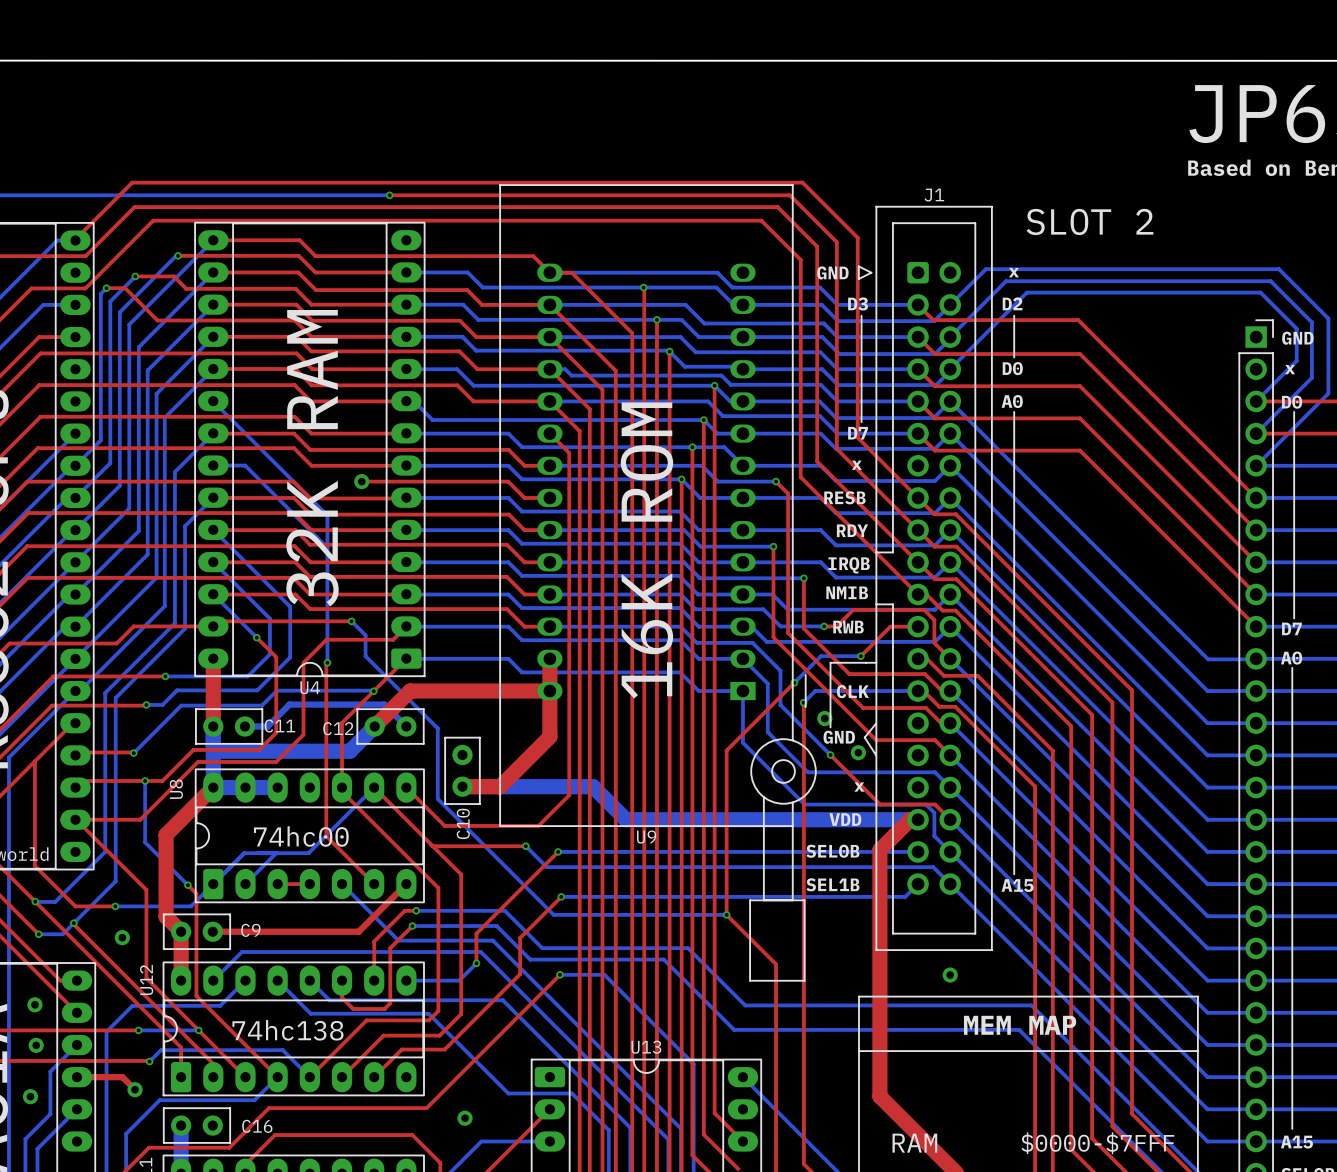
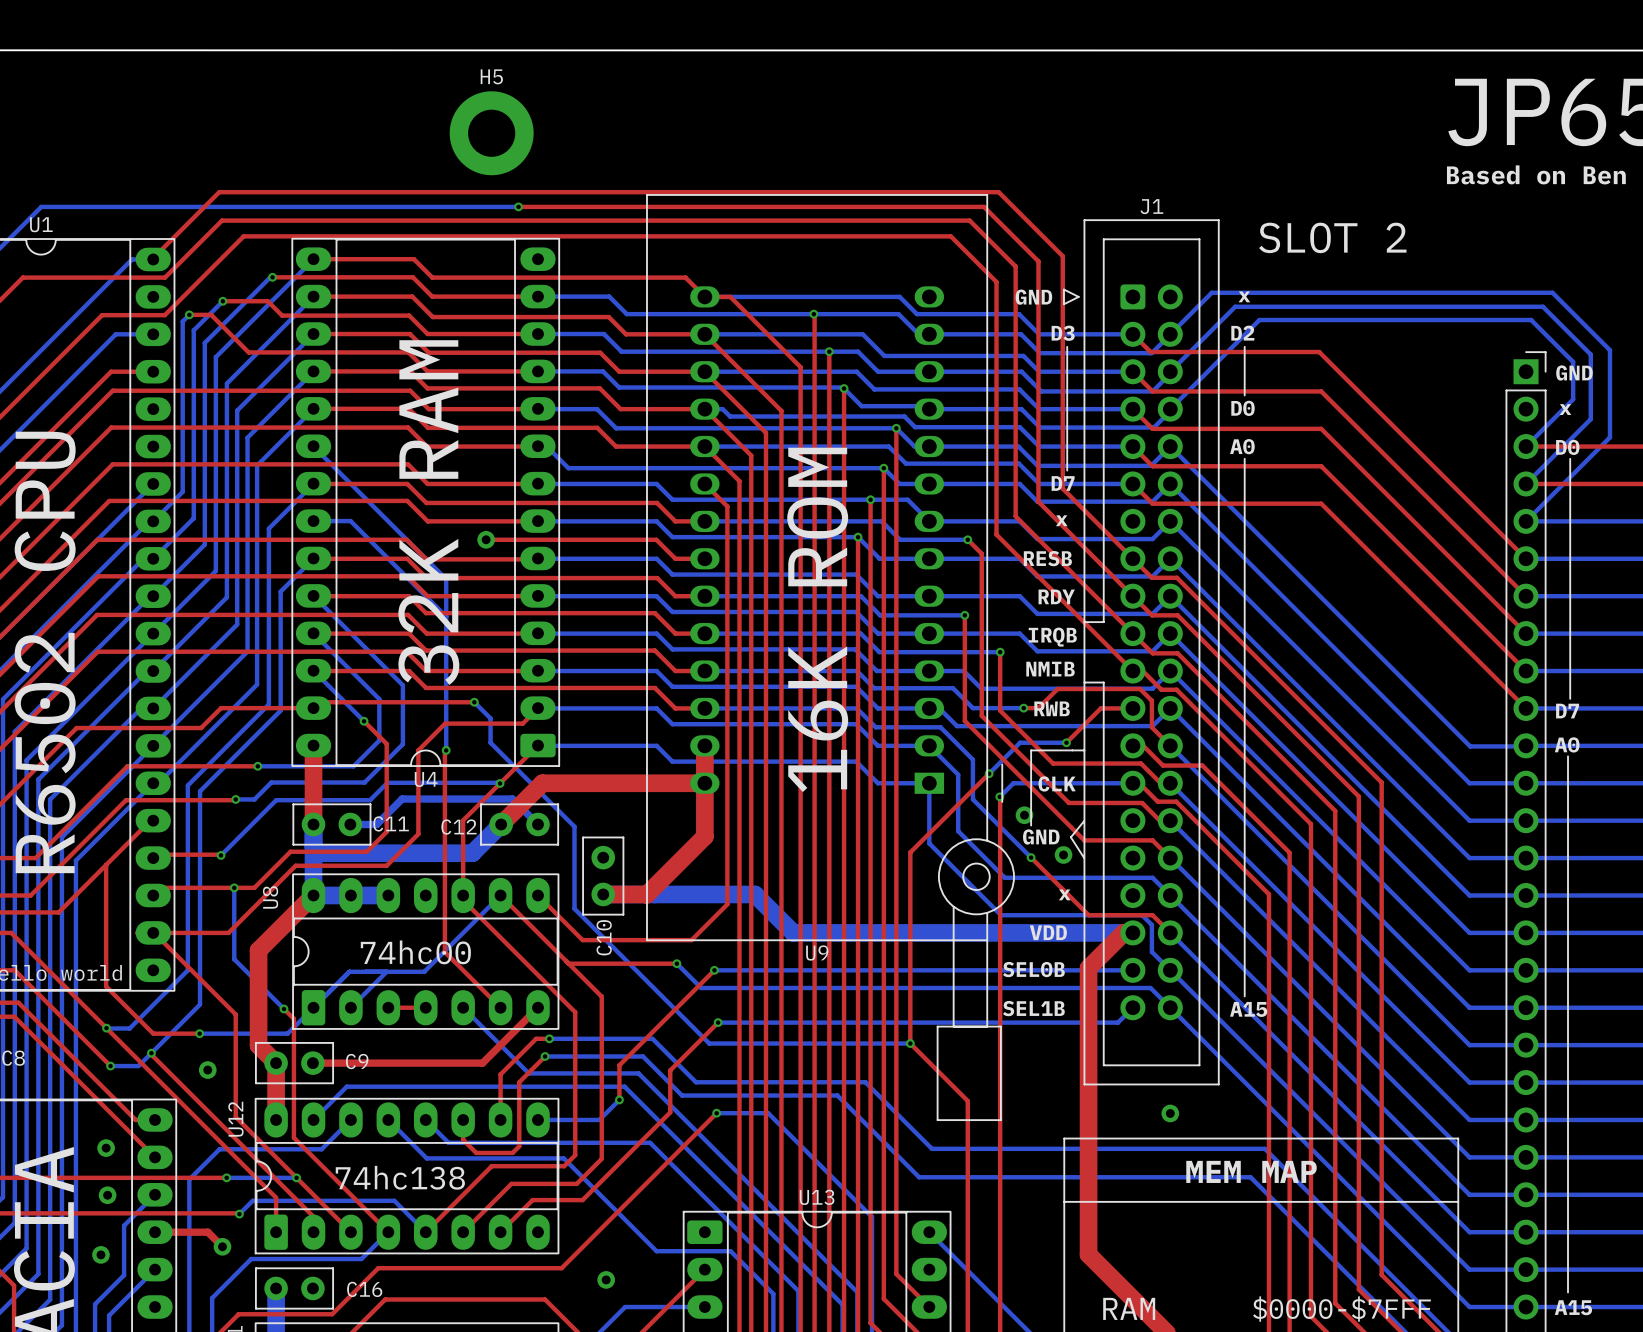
H5: none -> (491, 133)

